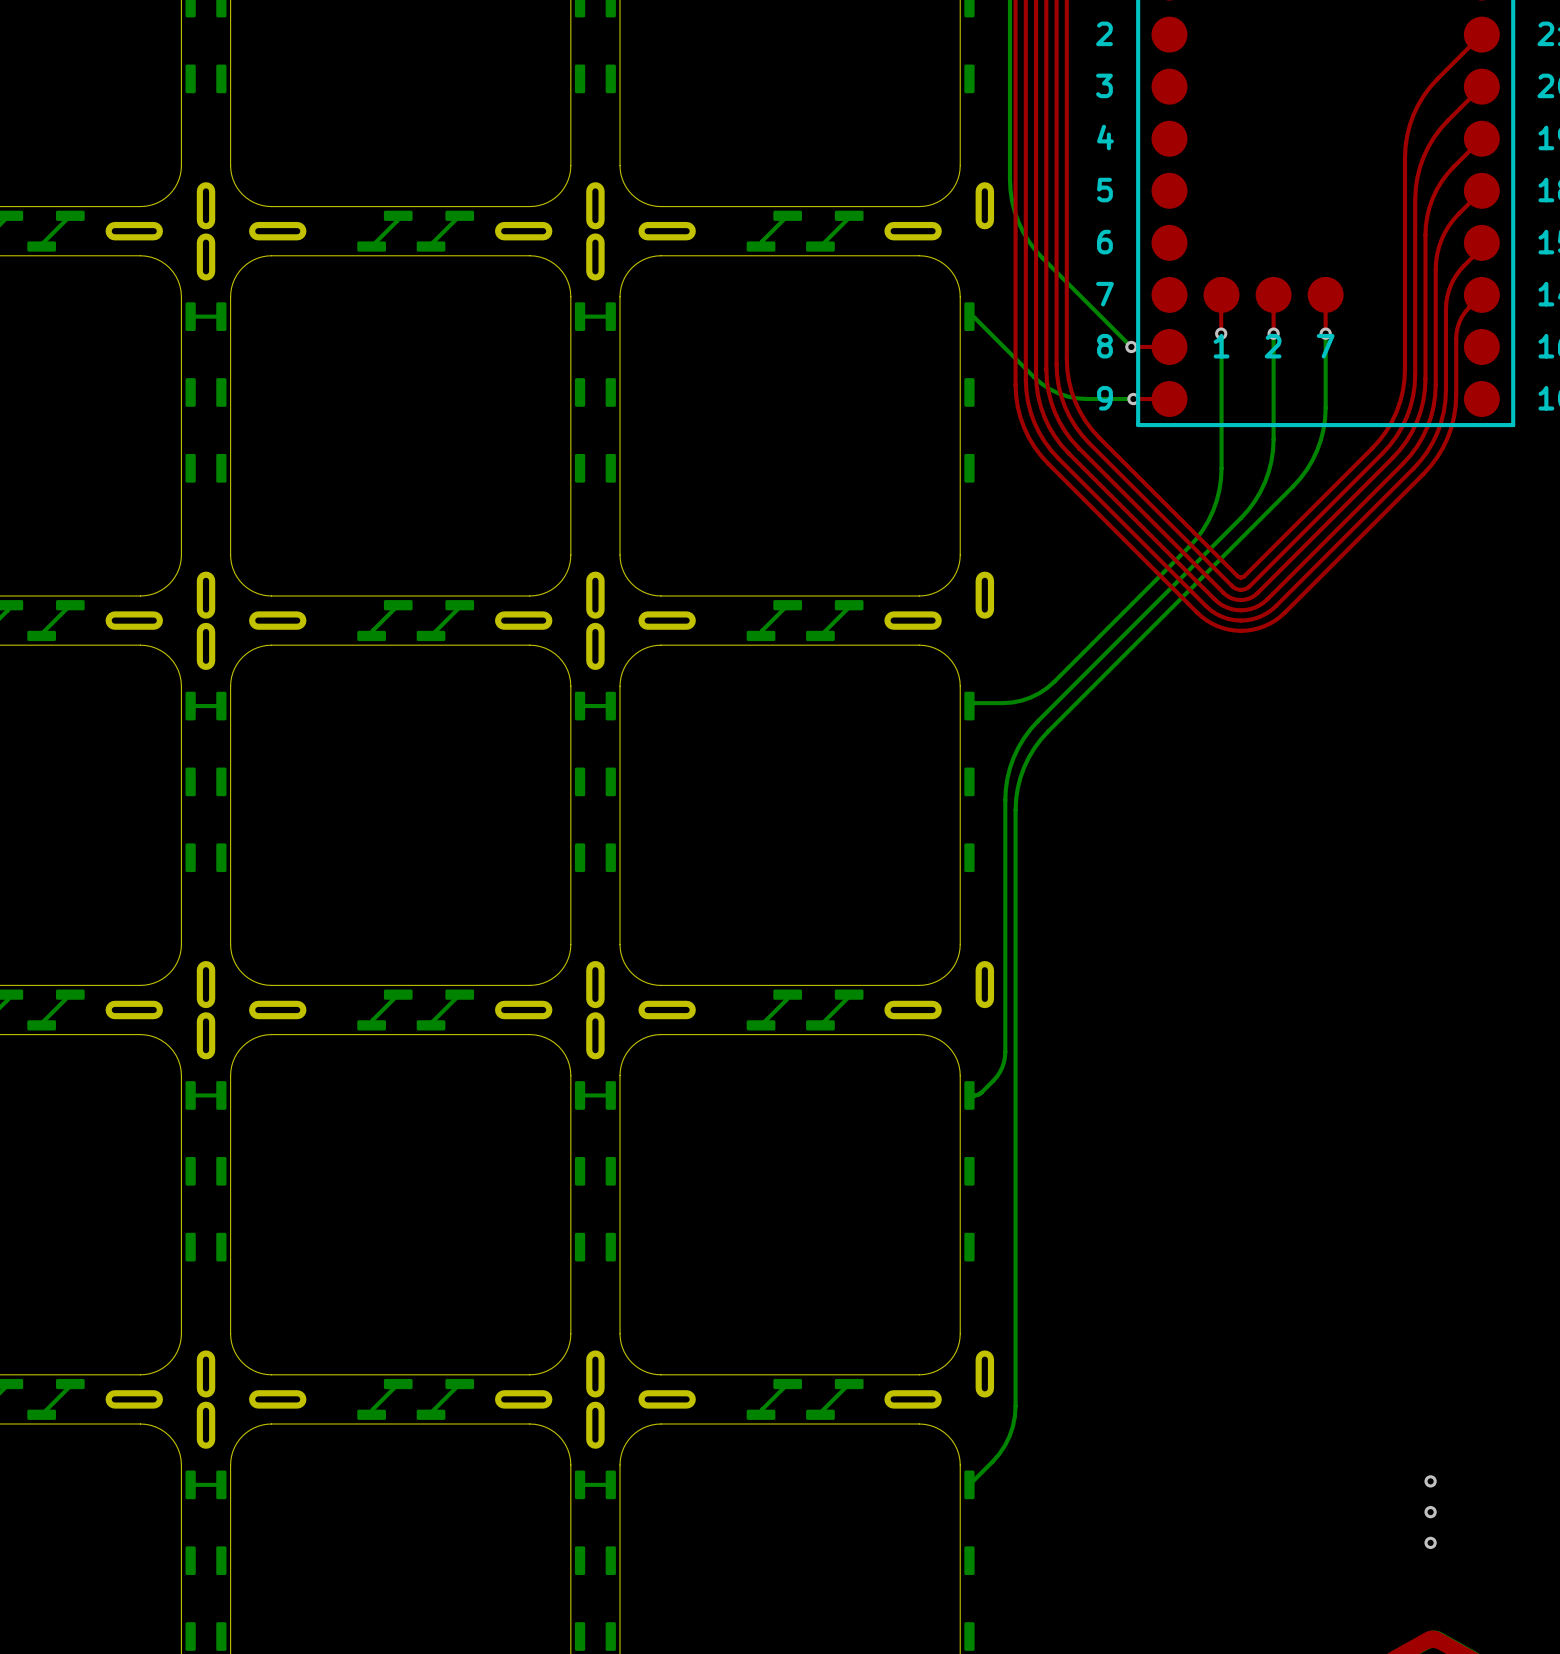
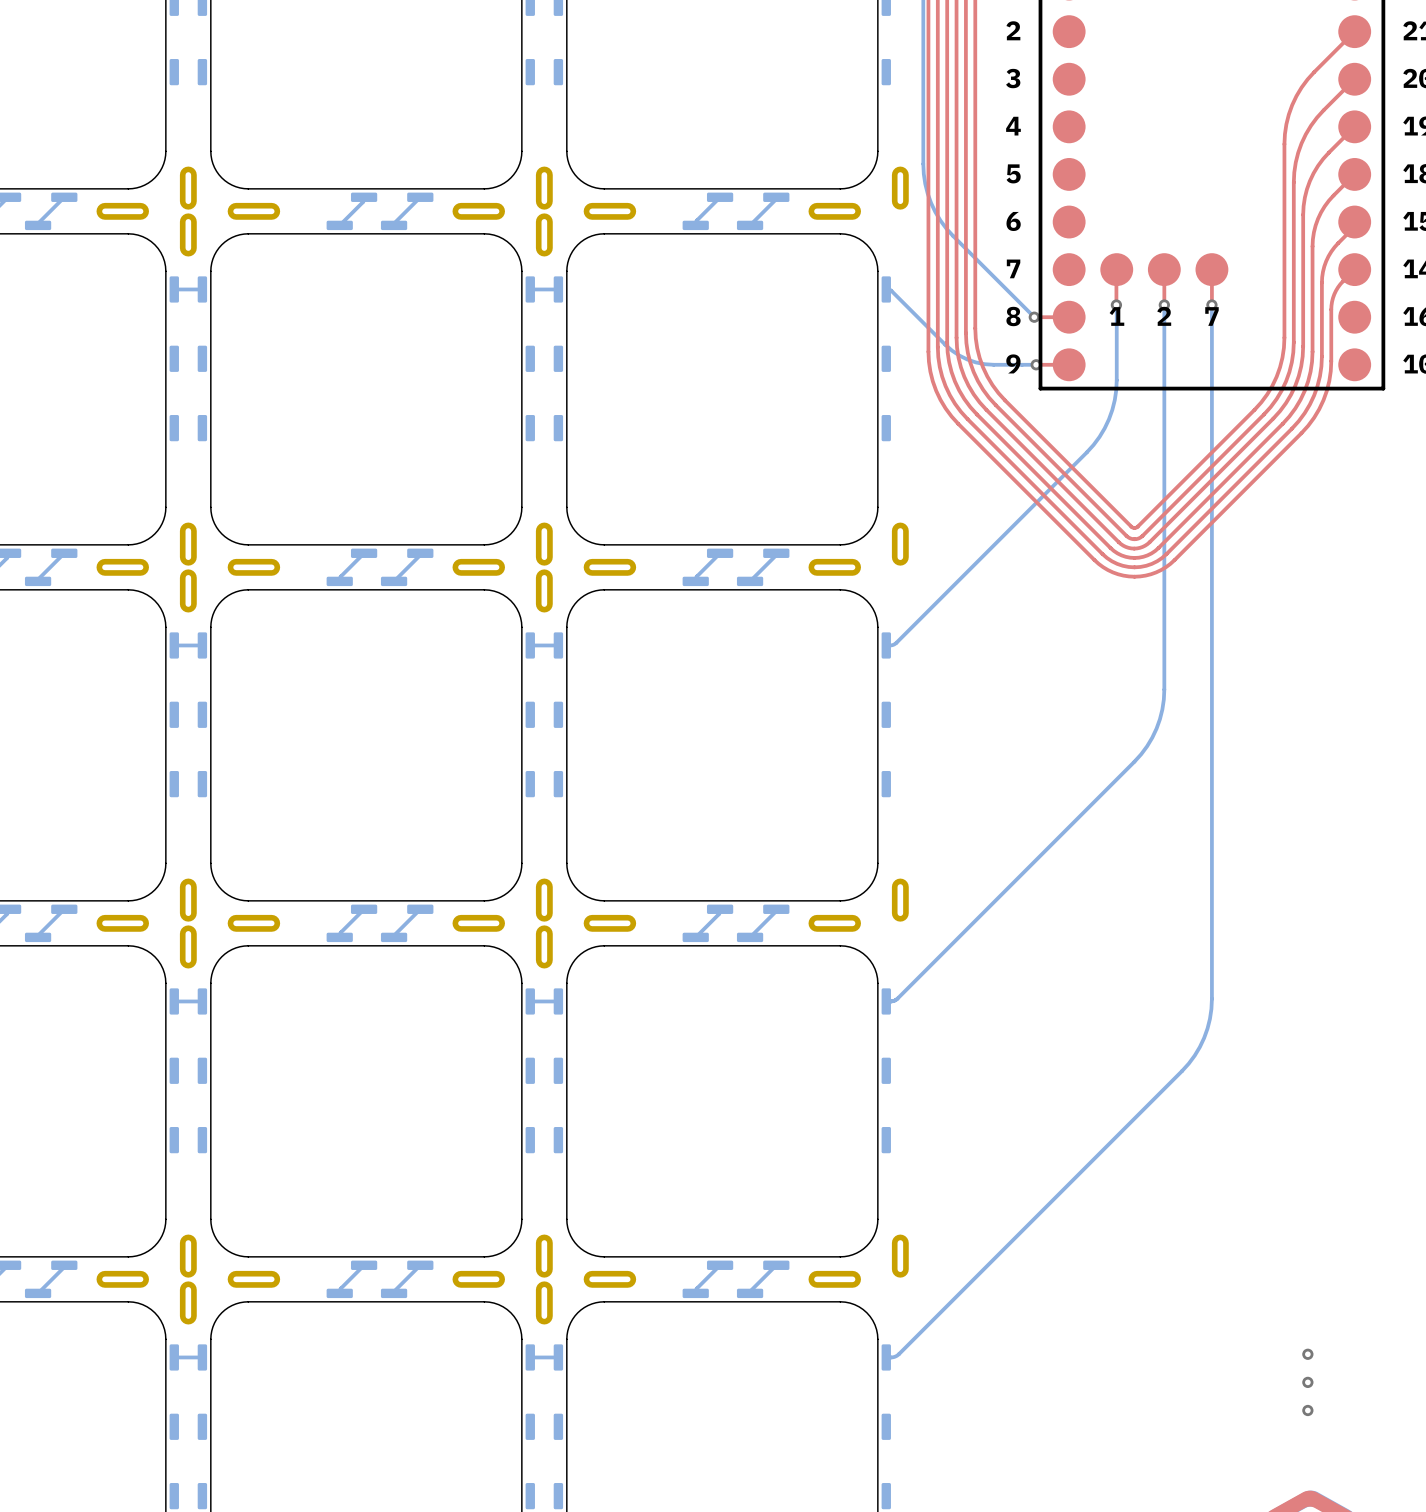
bottom track: (1325, 407) (1323, 429) (1317, 450) (1300, 478) (1048, 731) (1028, 757) (1020, 777) (1015, 810) (1014, 1416) (1005, 1445) (992, 1461) (969, 1484) -> (1211, 372) (1211, 998) (1207, 1028) (1199, 1047) (1182, 1071) (898, 1354) (893, 1357) (886, 1357)
bottom track: (1221, 415) (1221, 468) (1219, 490) (1208, 520) (1196, 539) (1047, 688) (1021, 700) (973, 703) (969, 706) -> (1116, 380) (1114, 400) (1108, 419) (1093, 444) (896, 642) (886, 645)
bottom track: (1273, 439) (1271, 461) (1265, 482) (1248, 510) (1037, 721) (1024, 738) (1013, 757) (1007, 778) (1005, 800) (1005, 1051) (1002, 1067) (993, 1080) -> (1164, 401) (1164, 689) (1162, 709) (1156, 728) (1147, 746) (1134, 761) (908, 987)

